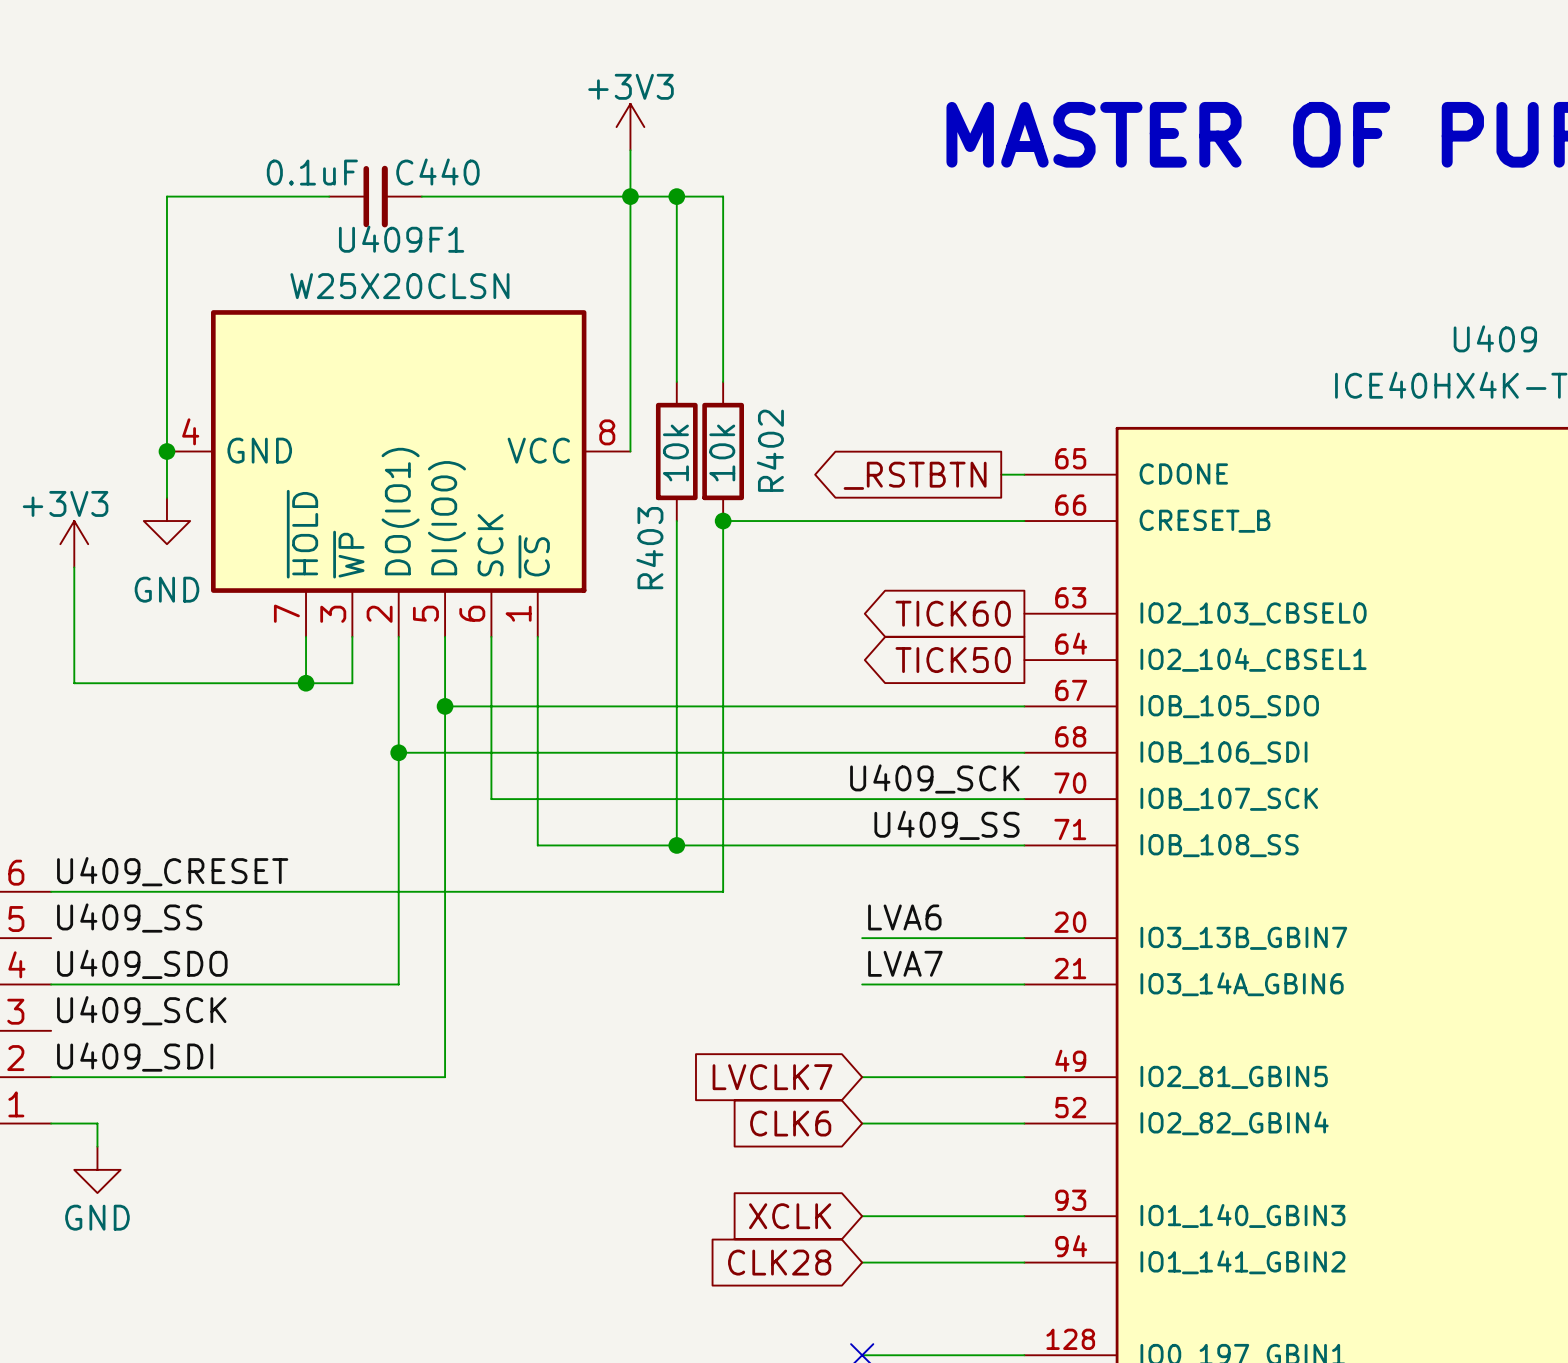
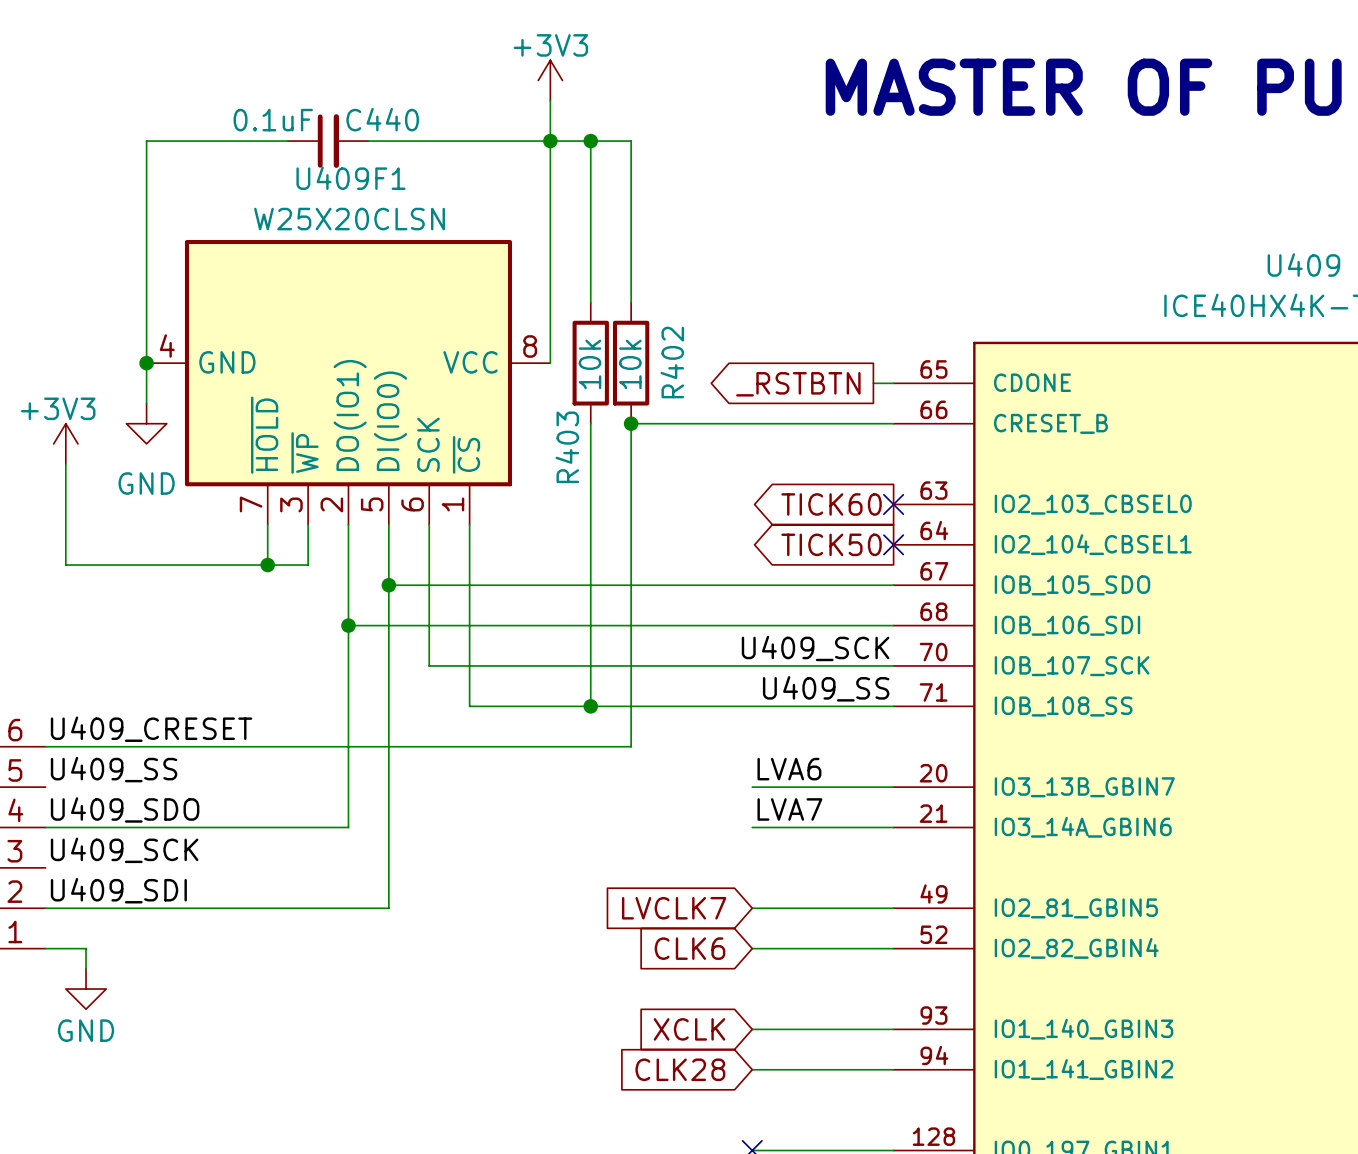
no-connect mark: none -> (893, 504)
no-connect mark: none -> (893, 544)

